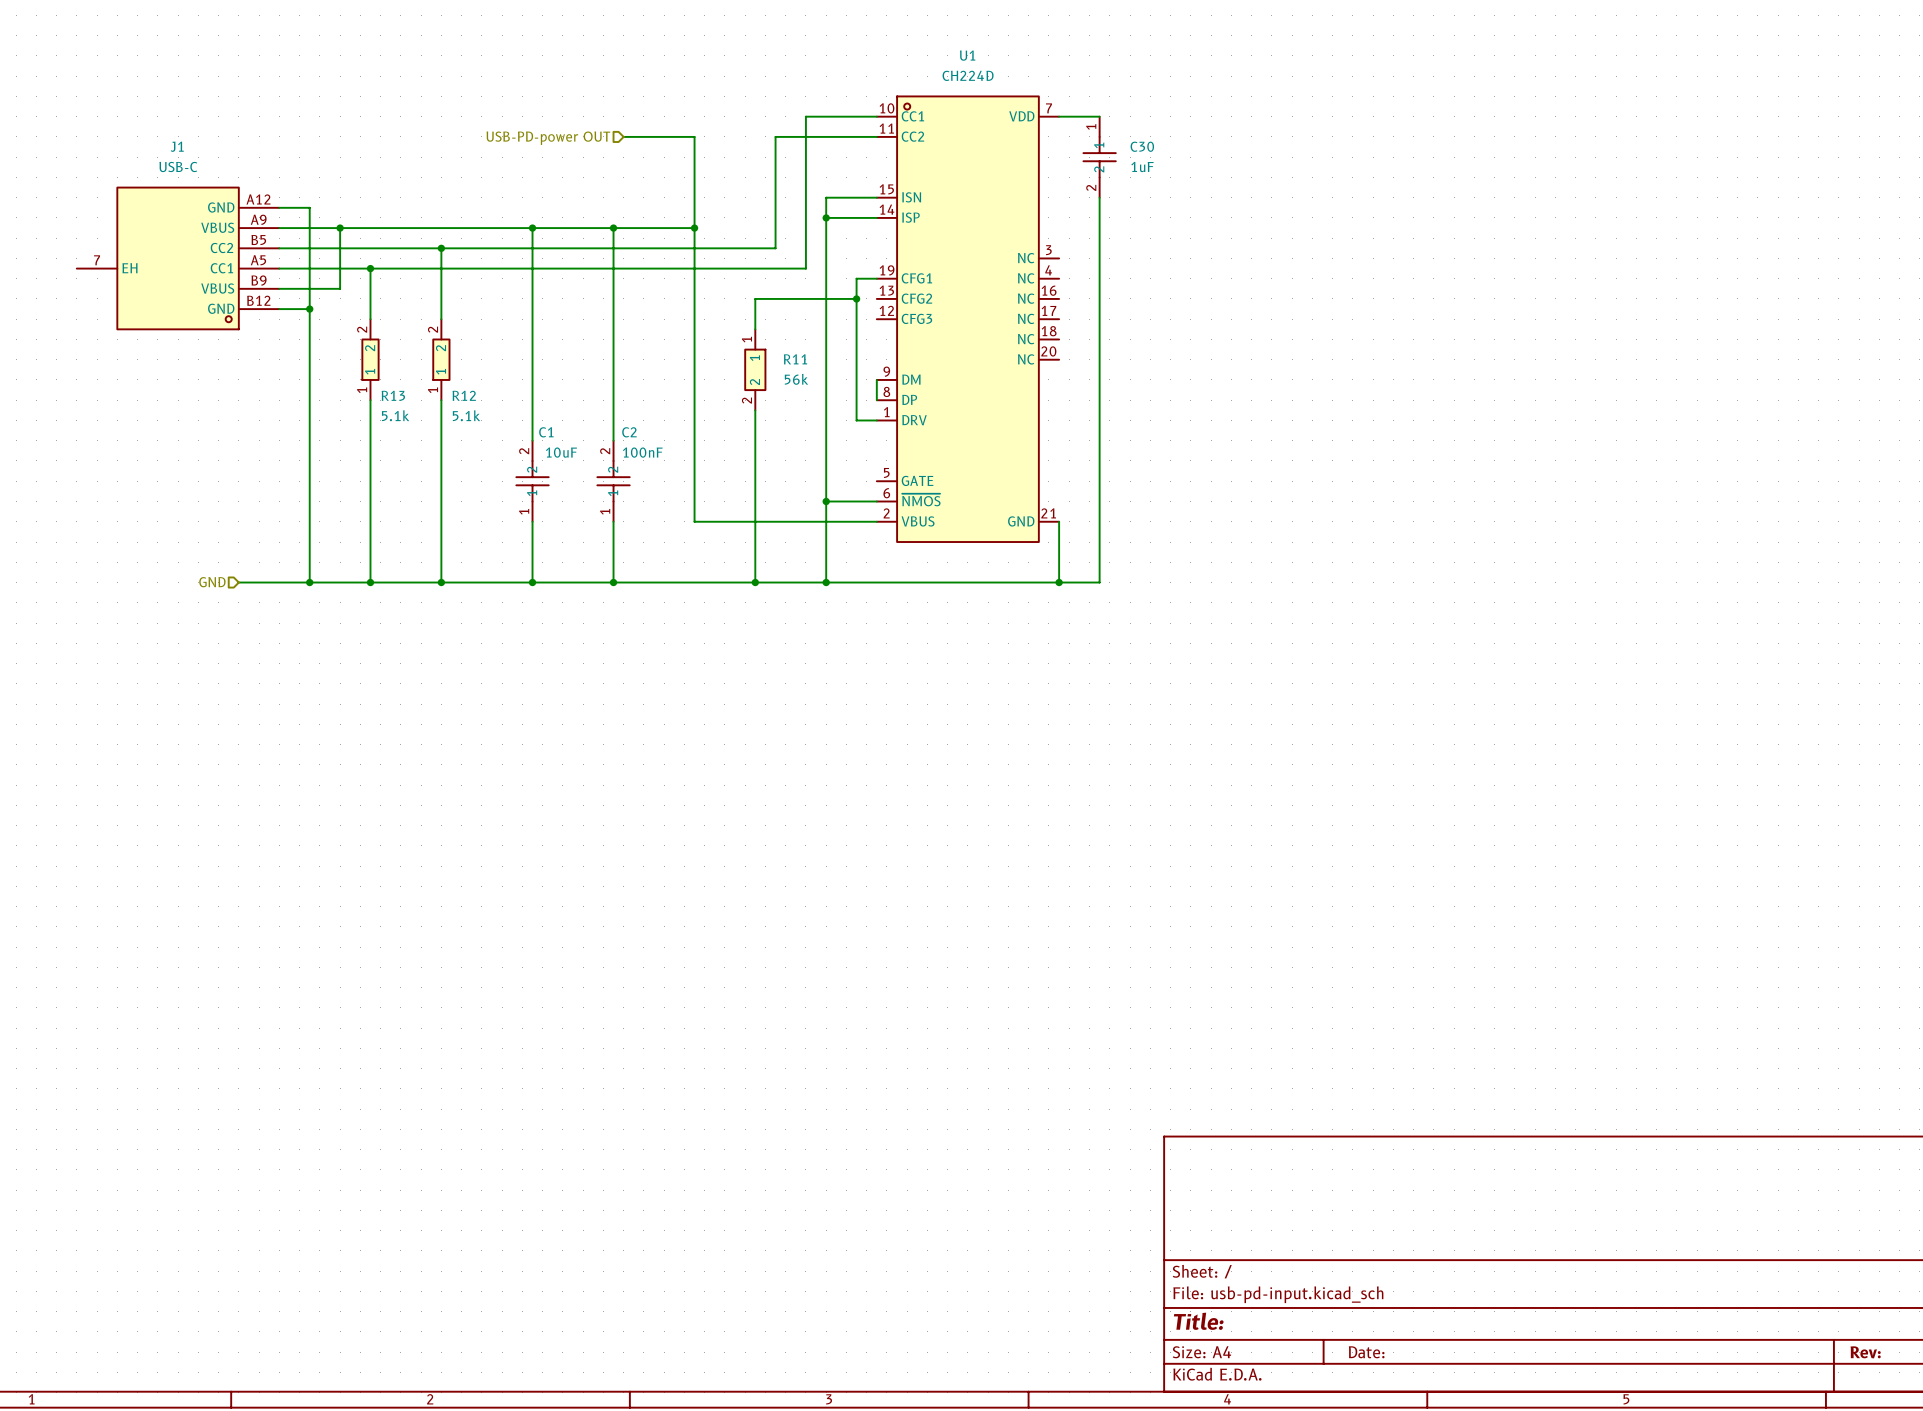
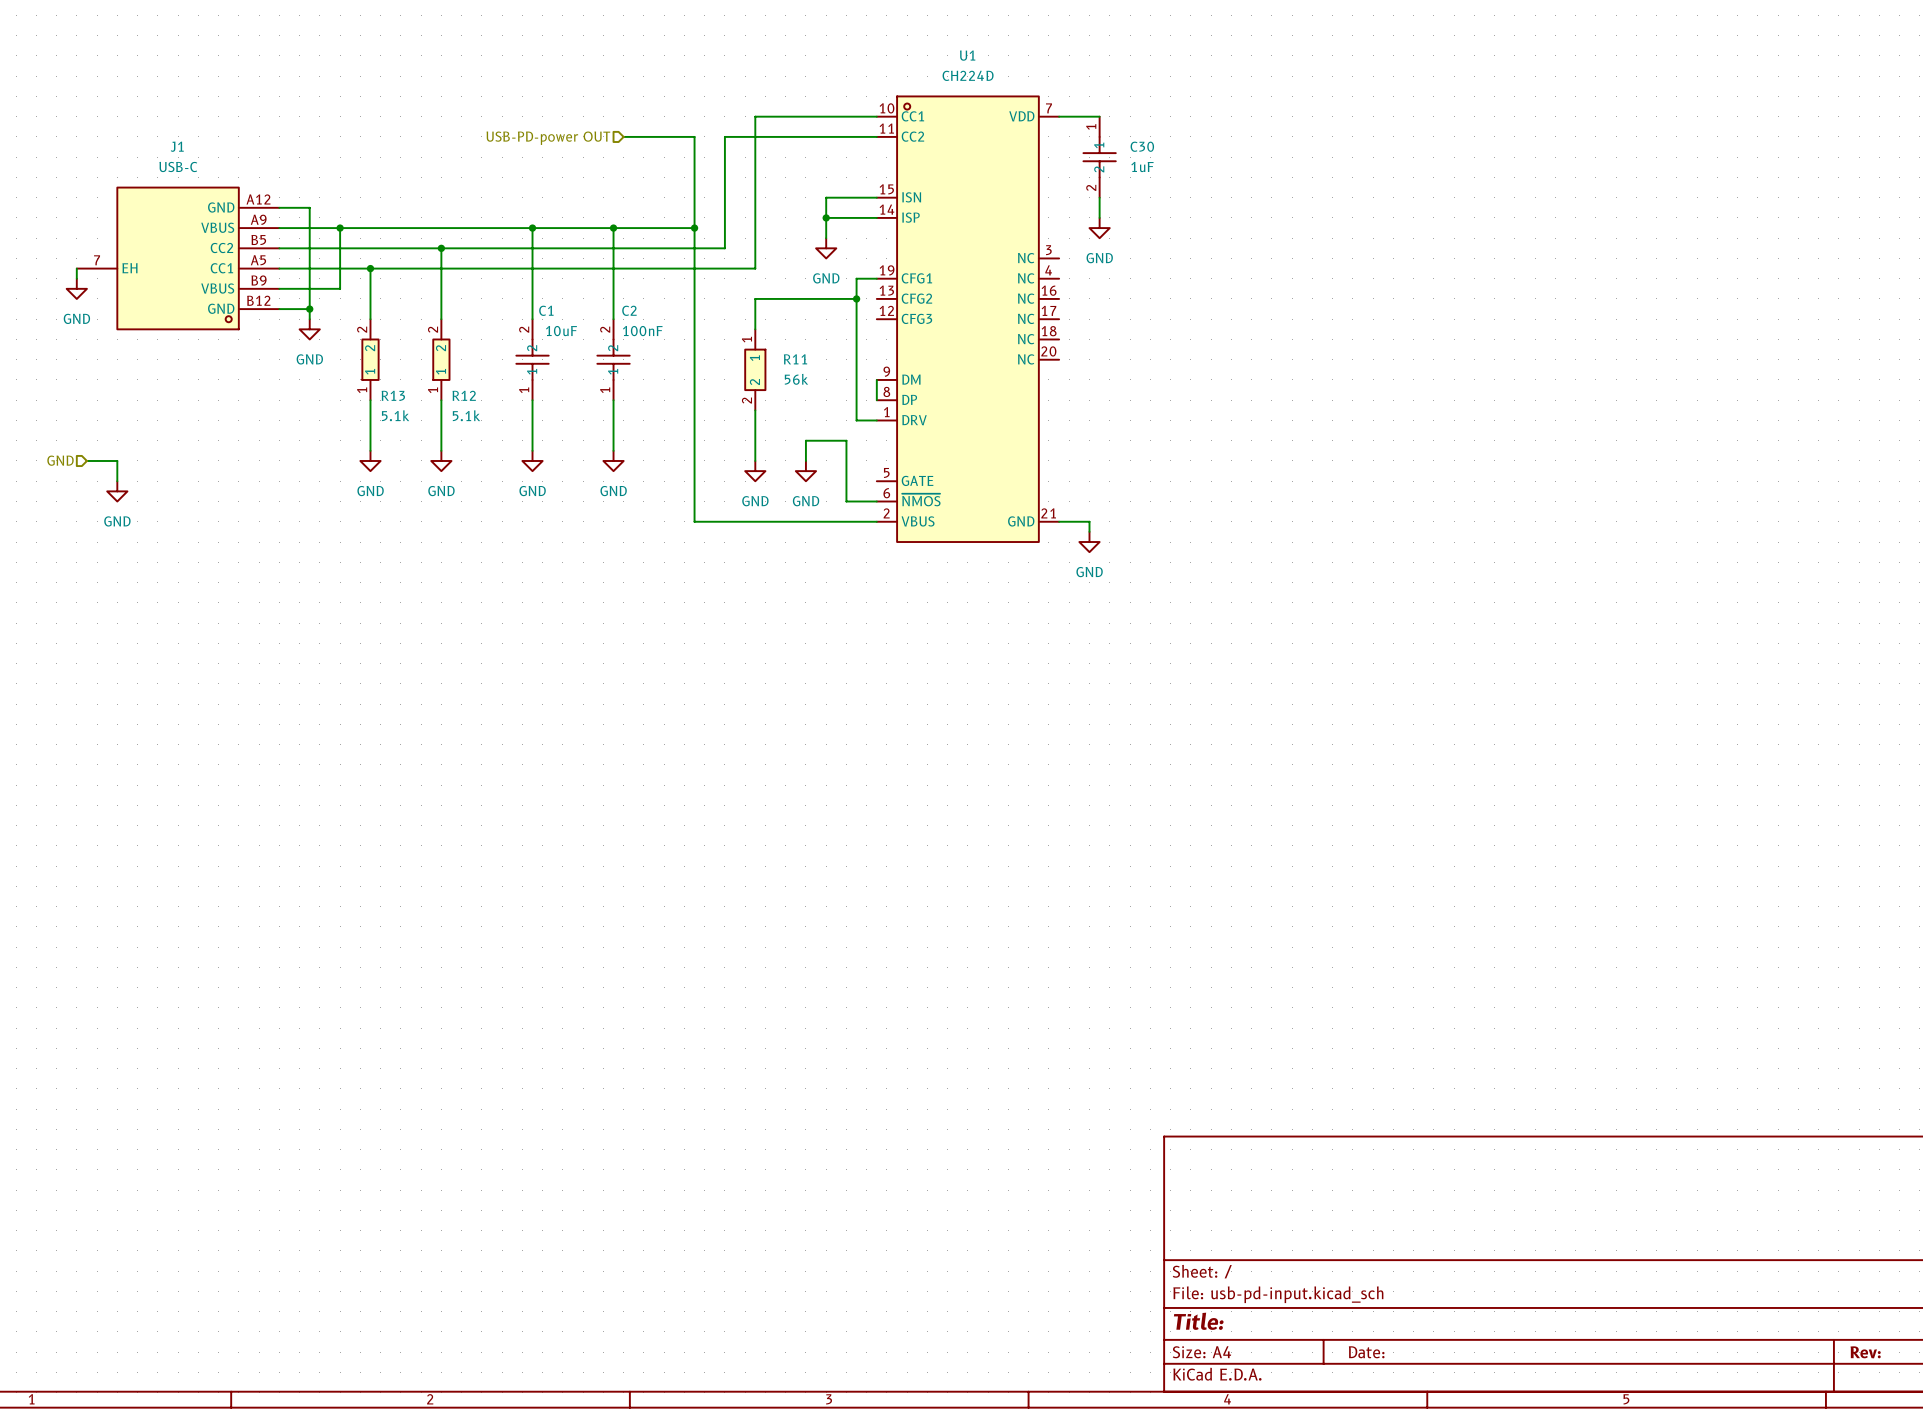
wire: (805, 116) (805, 268) (755, 268) -> (805, 116) (755, 116) (755, 268)
wire: (775, 136) (775, 248) (724, 248) -> (775, 136) (724, 136) (724, 248)
wire: (1099, 217) (1099, 582) (238, 582) -> none
power symbol: none -> GND (1099, 228)
wire: (826, 238) (826, 582) -> none
power symbol: none -> GND (826, 248)
wire: none -> (76, 268) (76, 278)
power symbol: none -> GND (76, 288)
wire: (309, 319) (309, 582) -> none
power symbol: none -> GND (309, 329)
wire: (370, 450) (370, 582) -> none
wire: (441, 450) (441, 582) -> none
wire: none -> (86, 460) (117, 460) (117, 481)
power symbol: none -> GND (370, 460)
power symbol: none -> GND (441, 460)
power symbol: none -> GND (532, 460)
power symbol: none -> GND (613, 460)
wire: (755, 460) (755, 582) -> none
power symbol: none -> GND (755, 471)
power symbol: none -> GND (805, 471)
C1 position: (532, 481) -> (532, 359)
C2 position: (613, 481) -> (613, 359)
power symbol: none -> GND (117, 491)
wire: (826, 501) (846, 501) -> (805, 460) (805, 440) (846, 440) (846, 501)
junction: (826, 501) -> none
wire: (532, 521) (532, 582) -> none
wire: (613, 521) (613, 582) -> none
wire: (1059, 521) (1059, 582) -> (1059, 521) (1089, 521) (1089, 531)
power symbol: none -> GND (1089, 542)
hierarchical label position: GND (212, 582) -> GND (60, 460)
junction: (309, 582) -> none
junction: (370, 582) -> none
junction: (441, 582) -> none
junction: (532, 582) -> none
junction: (613, 582) -> none
junction: (755, 582) -> none
junction: (826, 582) -> none
junction: (1059, 582) -> none

